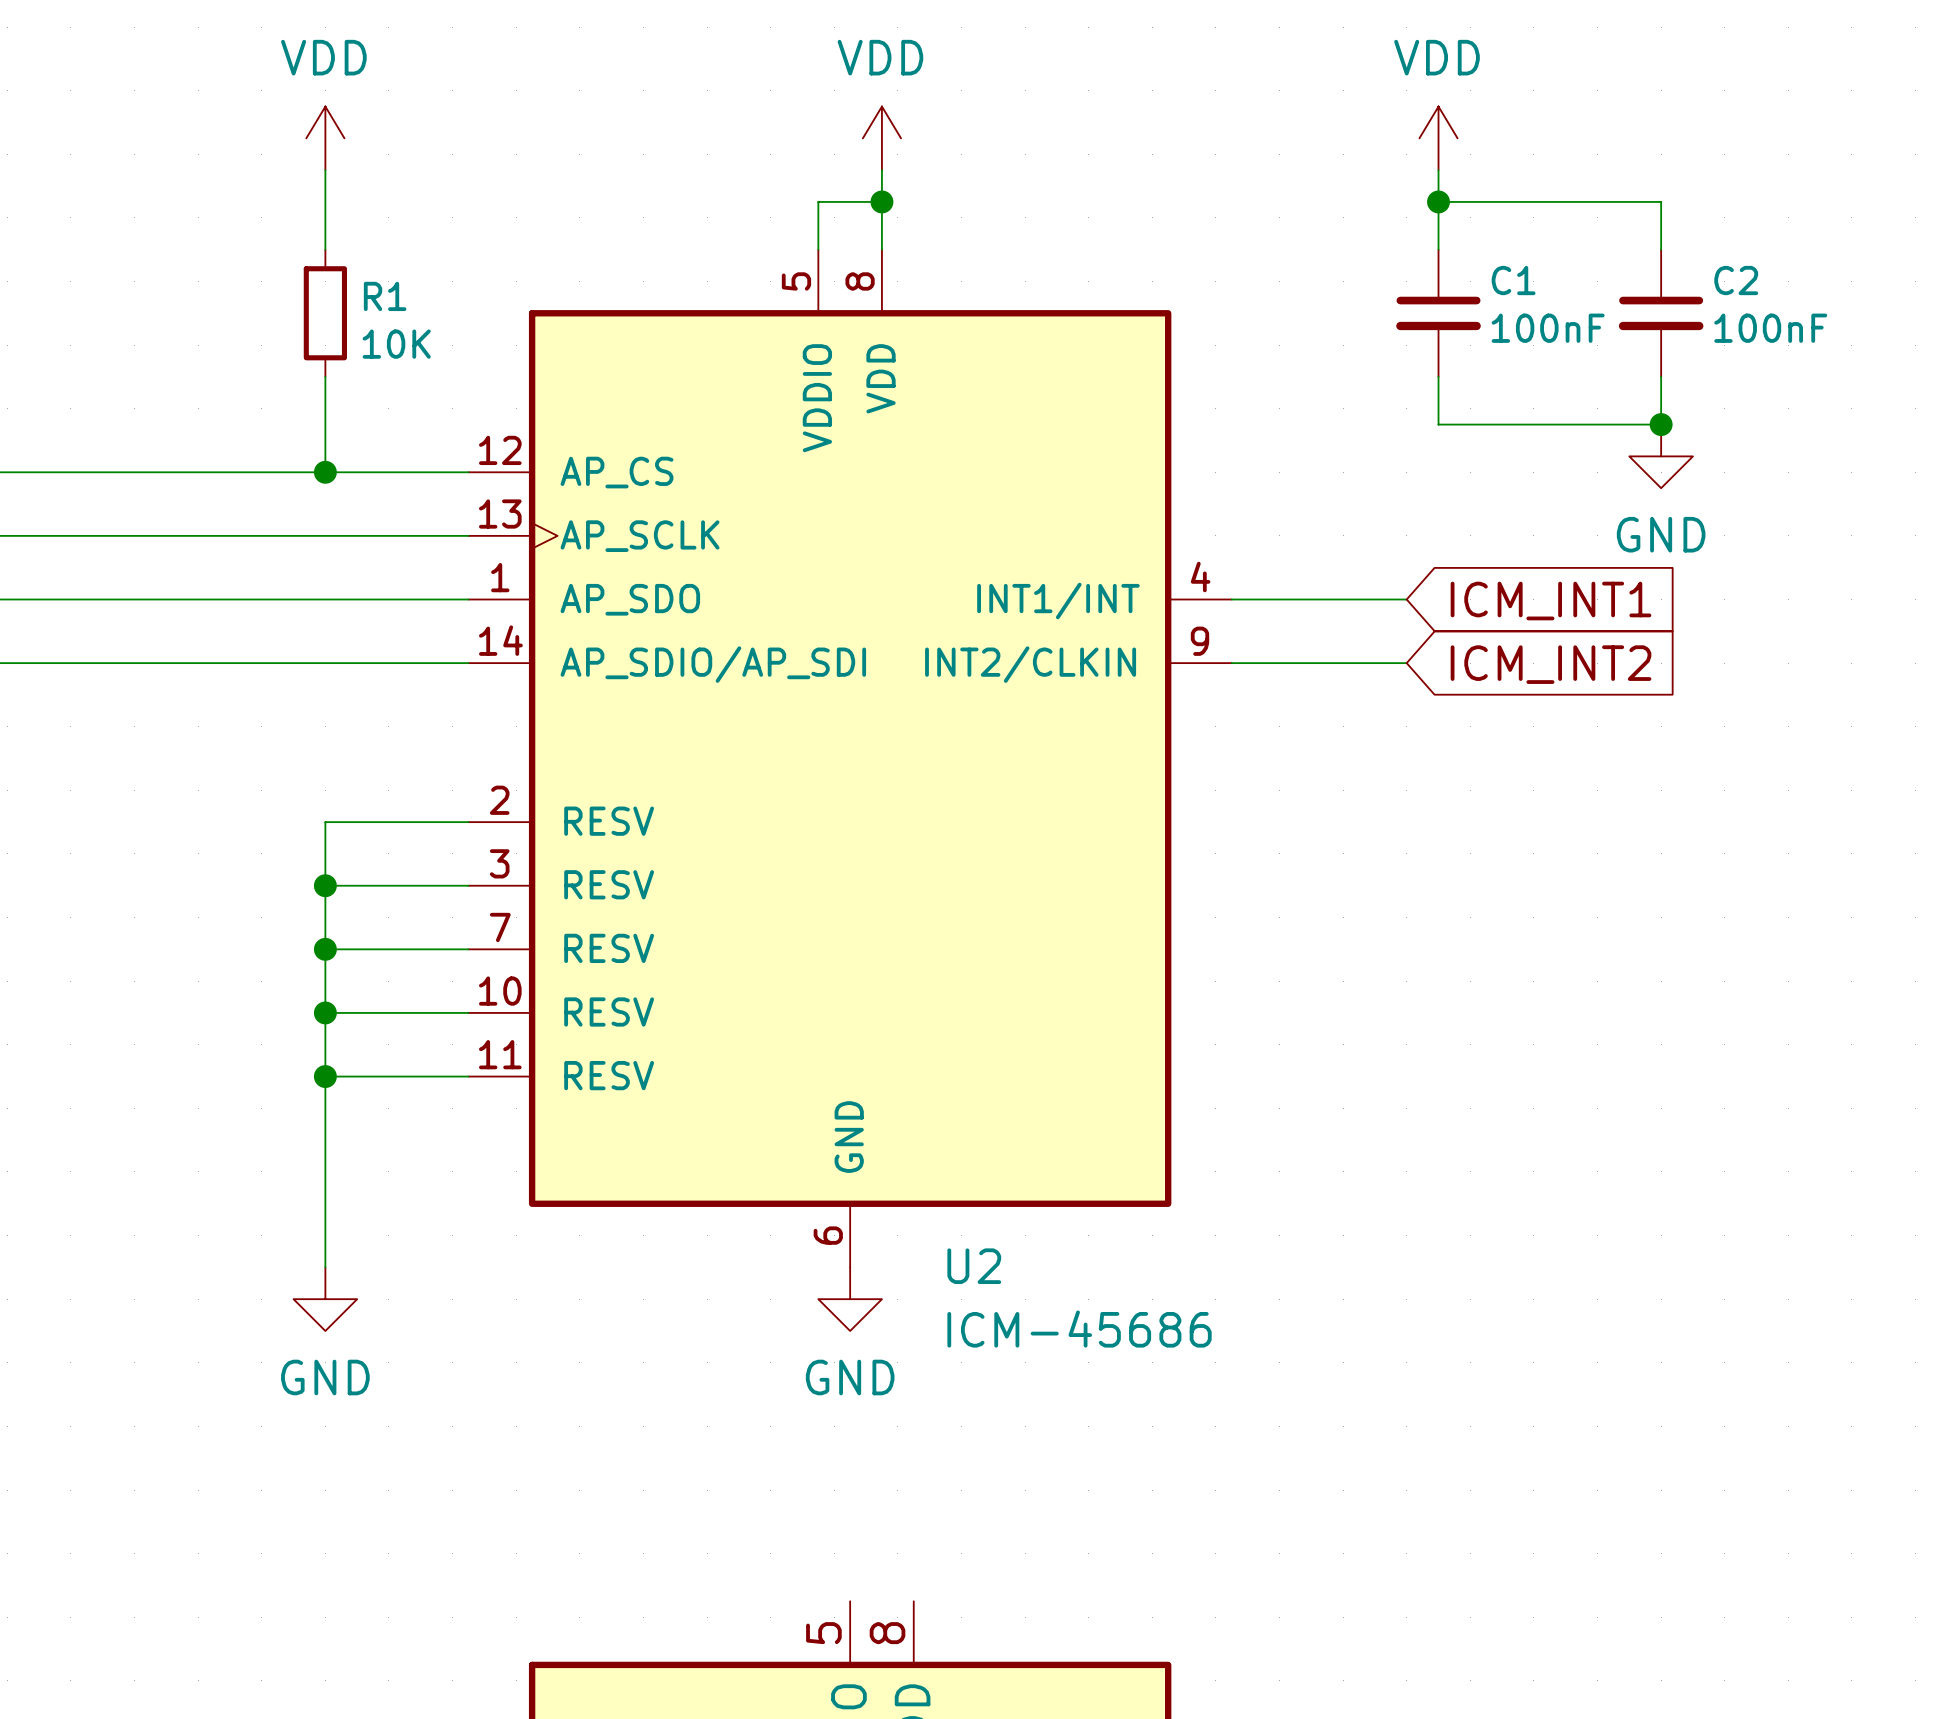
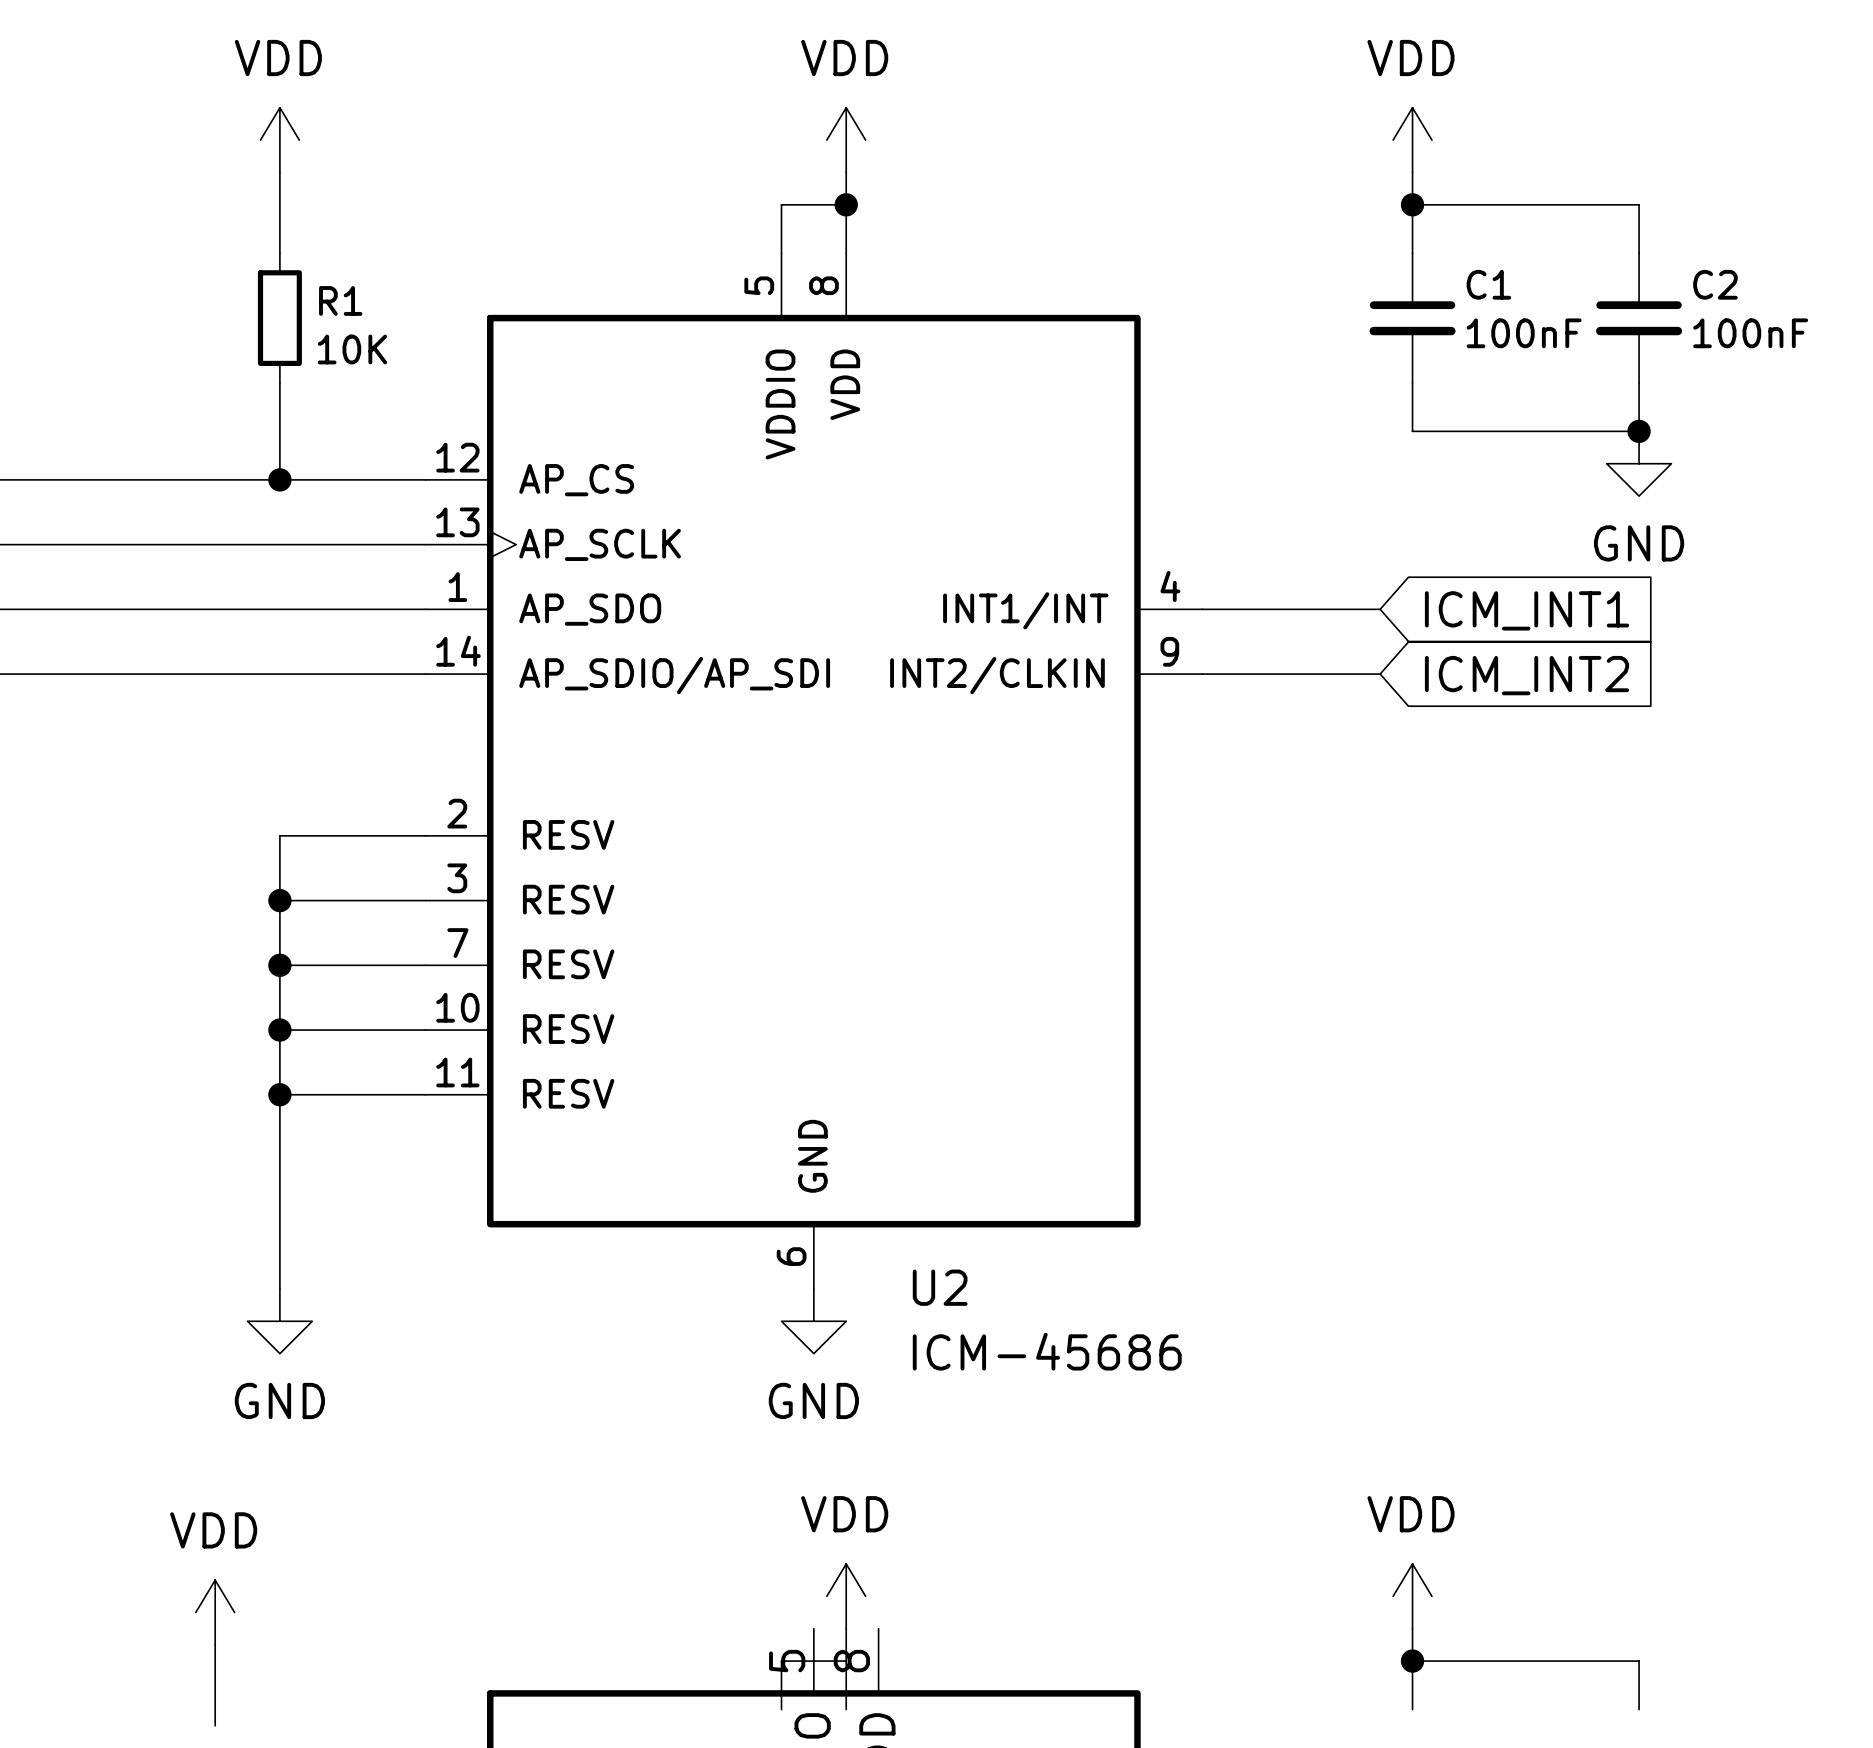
power symbol: none -> VDD (846, 1596)
power symbol: none -> VDD (1412, 1596)
power symbol: none -> VDD (215, 1612)
wire: none -> (846, 1628) (846, 1709)
wire: none -> (1412, 1628) (1412, 1709)
wire: none -> (215, 1644) (215, 1725)
wire: none -> (846, 1661) (781, 1661) (781, 1709)
wire: none -> (1412, 1661) (1639, 1661) (1639, 1709)
junction: none -> (1412, 1661)

